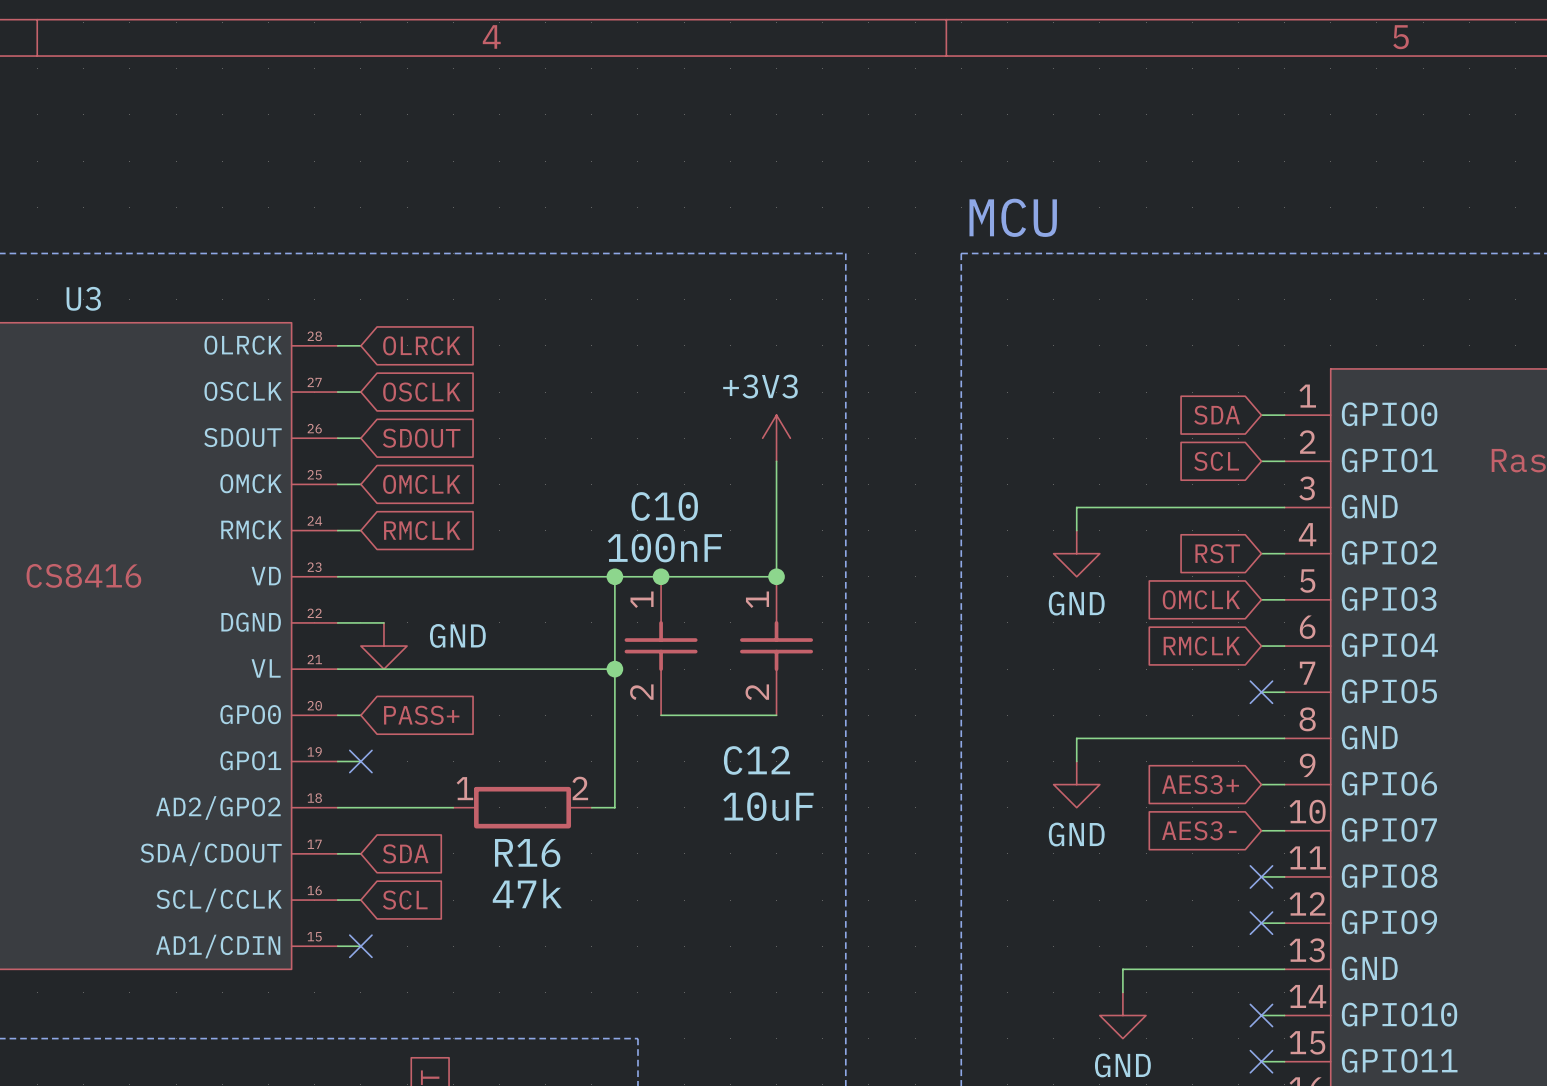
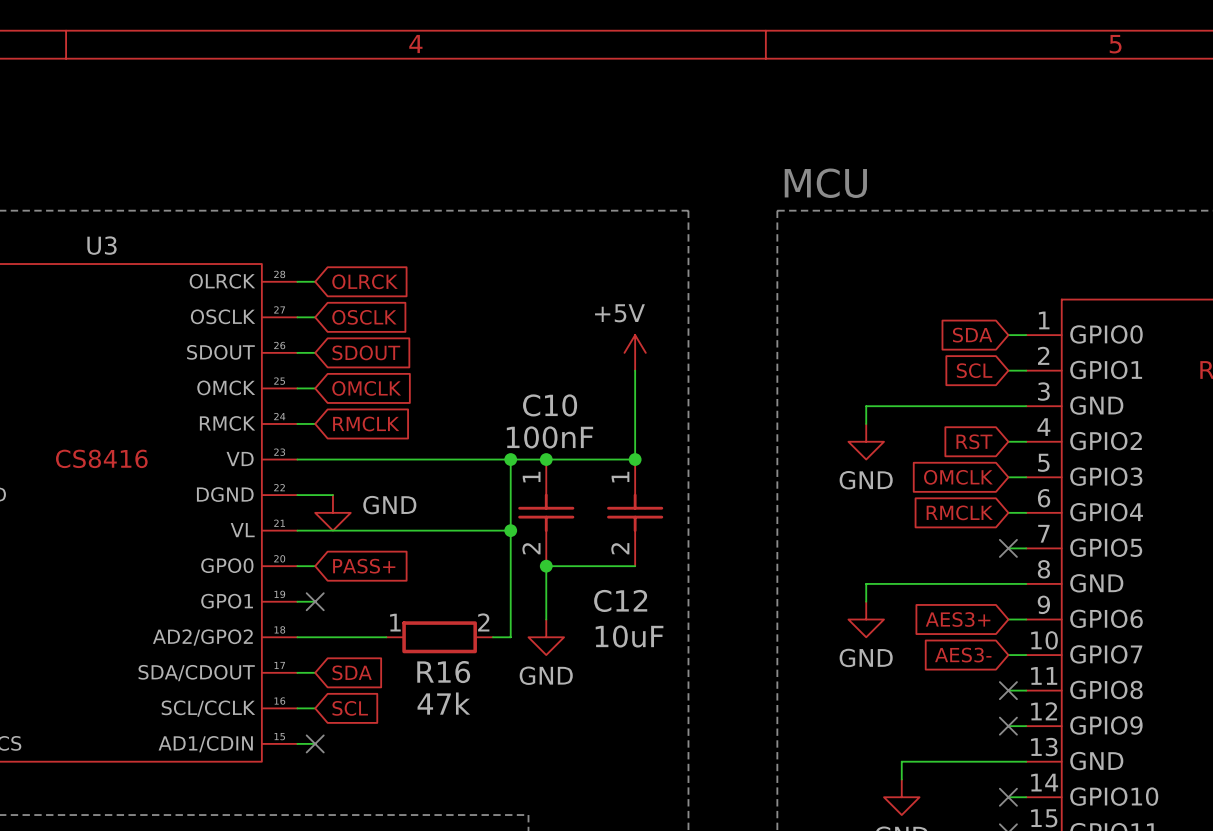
power symbol: +3V3 (776, 438) -> +5V (635, 352)
wire: none -> (546, 566) (546, 619)
junction: none -> (546, 566)
power symbol: none -> GND (546, 637)

